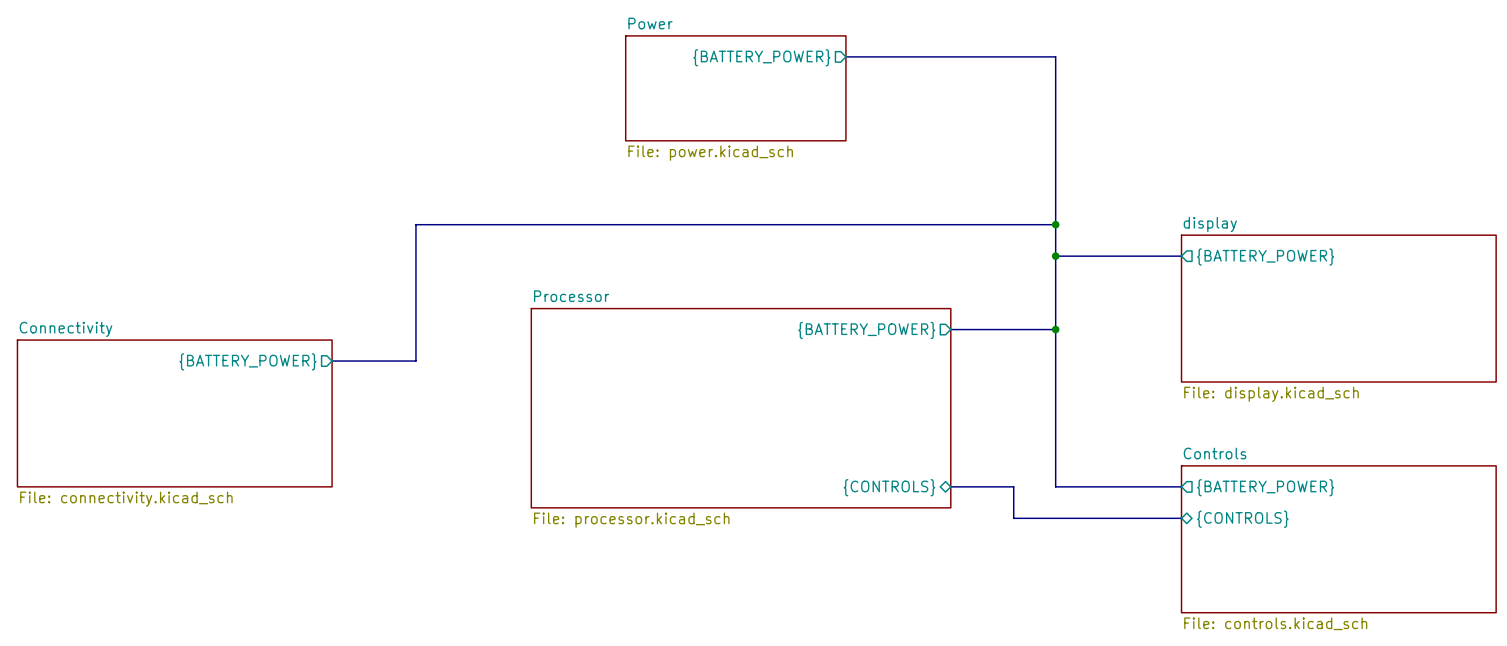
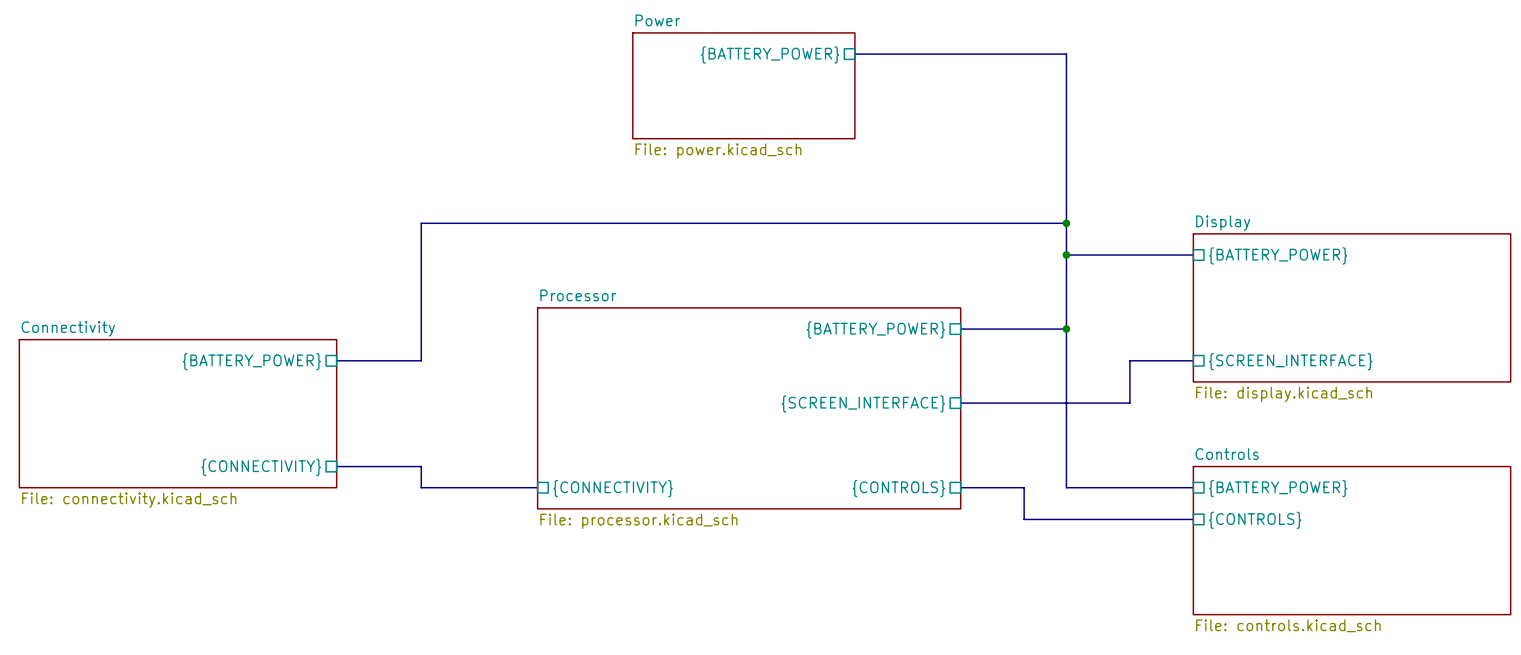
sheet pin shape: output (761, 57) -> passive (770, 54)
sheet display name: display (1210, 224) -> Display (1223, 223)
sheet pin shape: output (1265, 257) -> passive (1278, 255)
sheet pin shape: output (866, 330) -> passive (875, 329)
sheet pin shape: output (248, 361) -> passive (251, 361)
bus: none -> (1193, 360) (1129, 360) (1129, 403) (960, 403)
sheet pin: none -> {SCREEN_INTERFACE} (1290, 361)
sheet pin: none -> {SCREEN_INTERFACE} (863, 403)
bus: none -> (336, 466) (421, 466) (421, 487) (537, 487)
sheet pin: none -> {CONNECTIVITY} (261, 467)
sheet pin: none -> {CONNECTIVITY} (613, 488)
sheet pin shape: bidirectional (889, 487) -> passive (898, 488)
sheet pin shape: output (1265, 487) -> passive (1278, 488)
sheet pin shape: bidirectional (1242, 519) -> passive (1255, 520)

